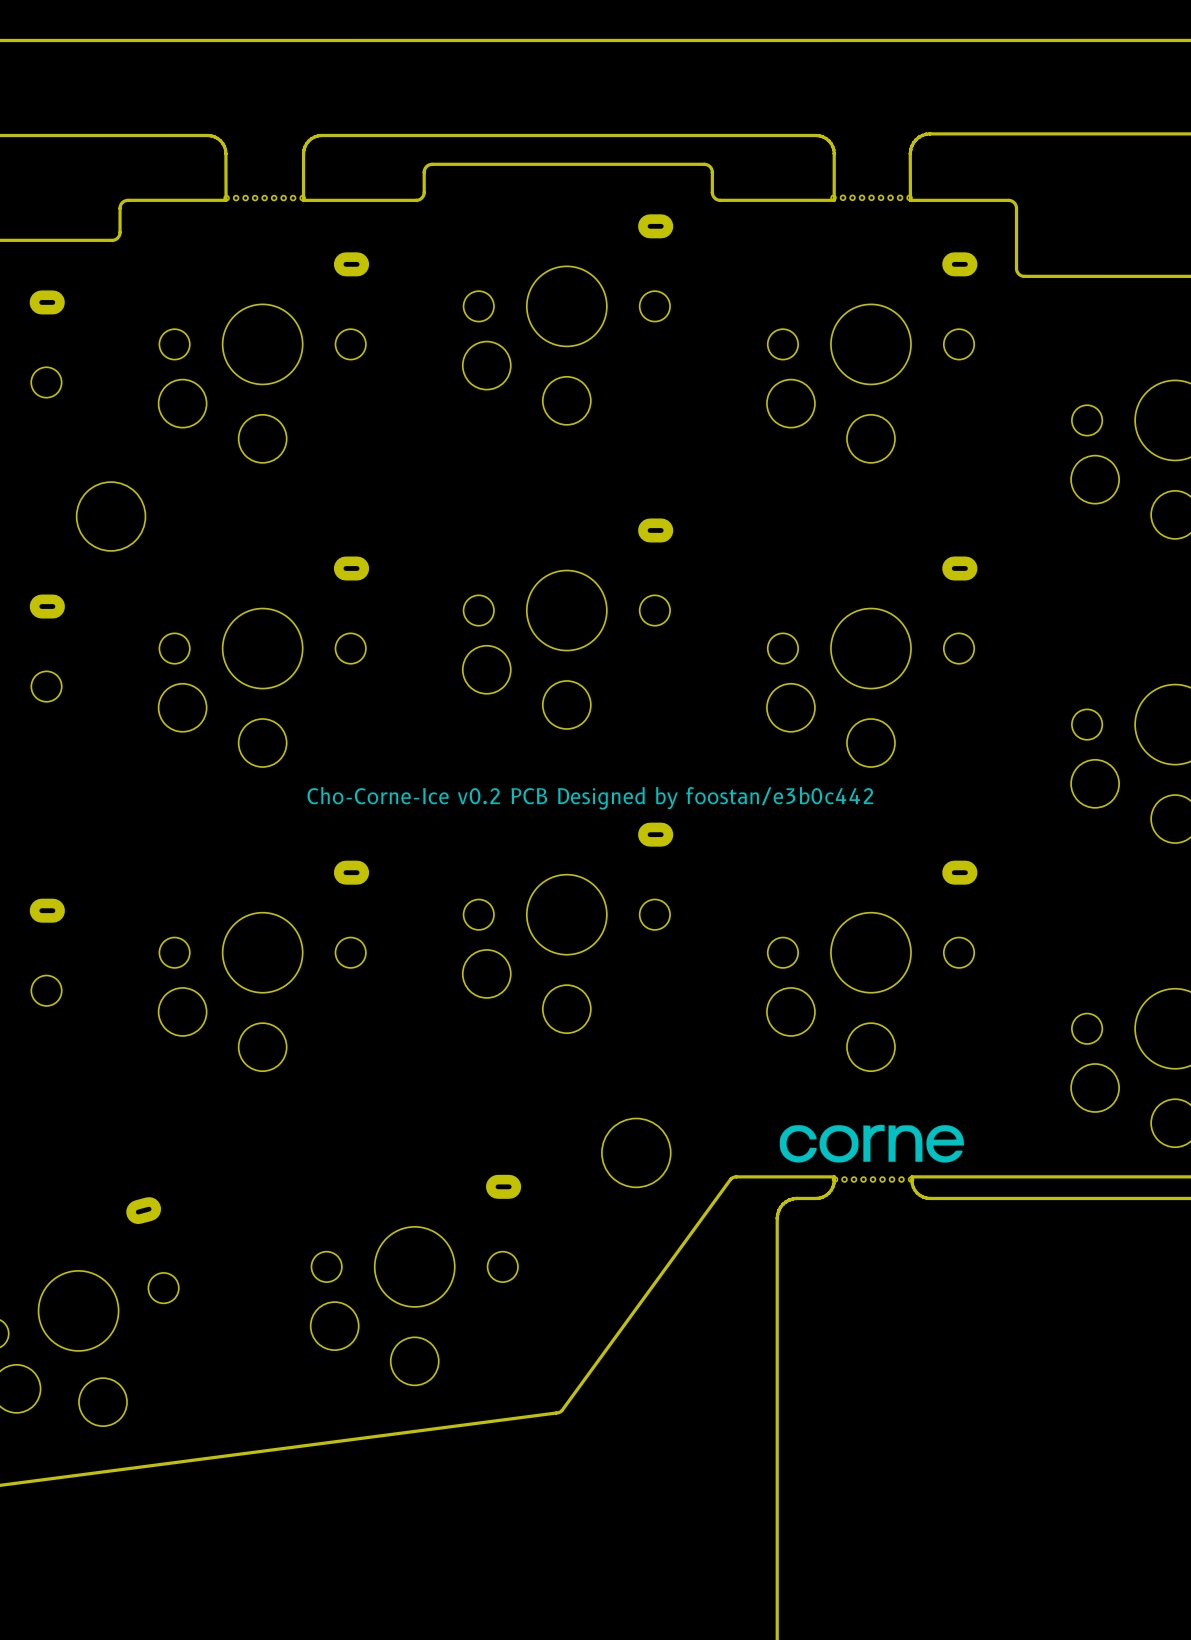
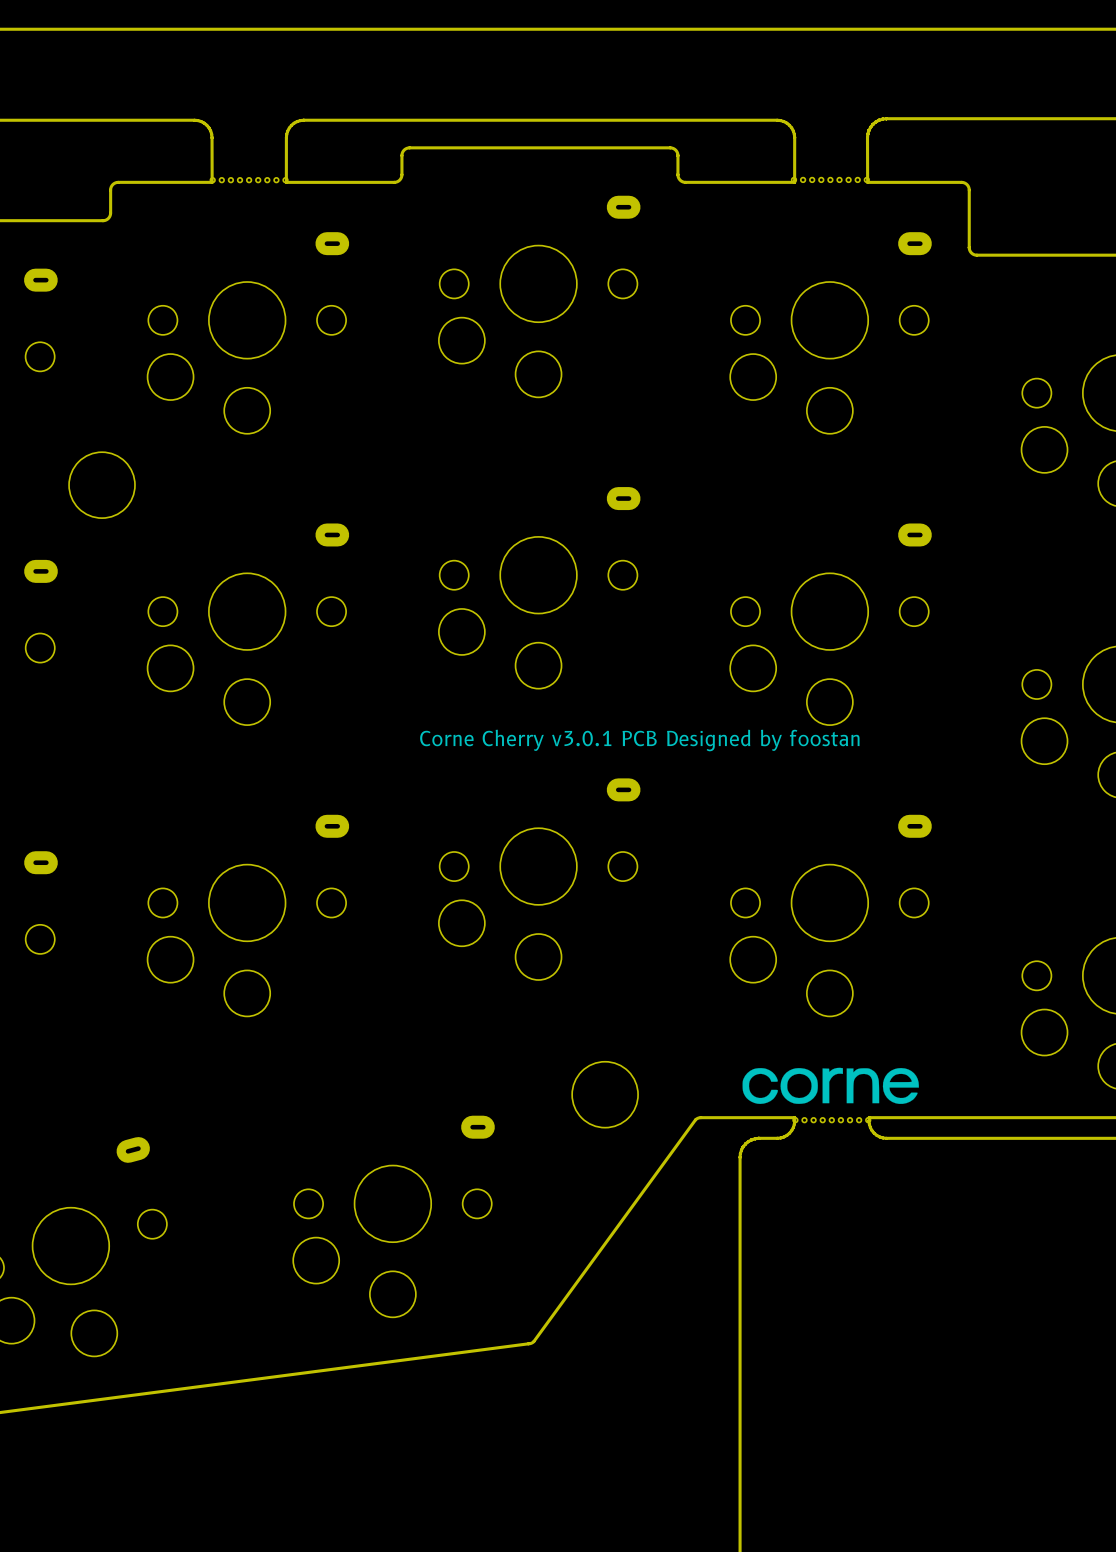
text: Cho-Corne-Ice v0.2 PCB Designed by foostan/e3b0c442 (590, 798) -> Corne Cherry v3.0.1 PCB Designed by foostan (639, 740)

